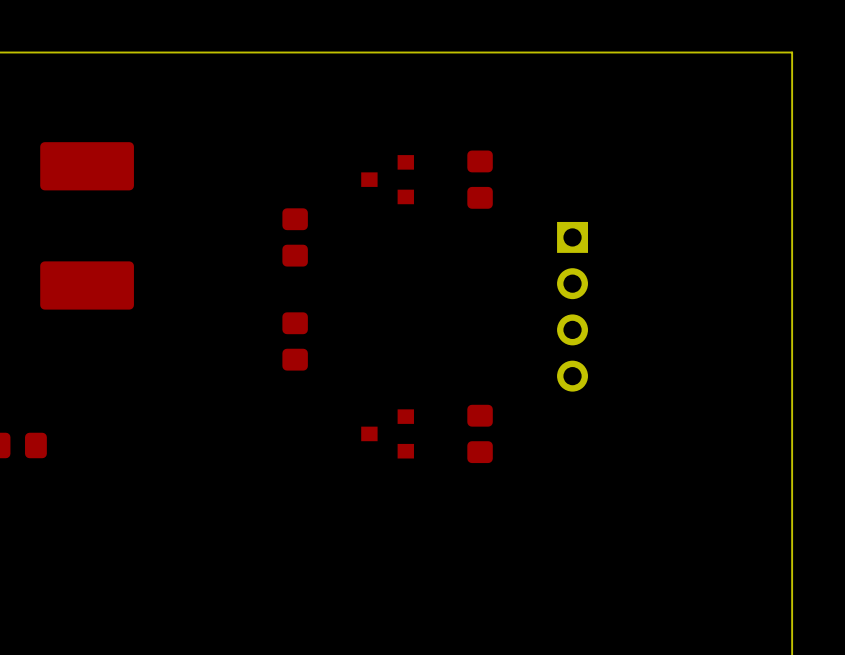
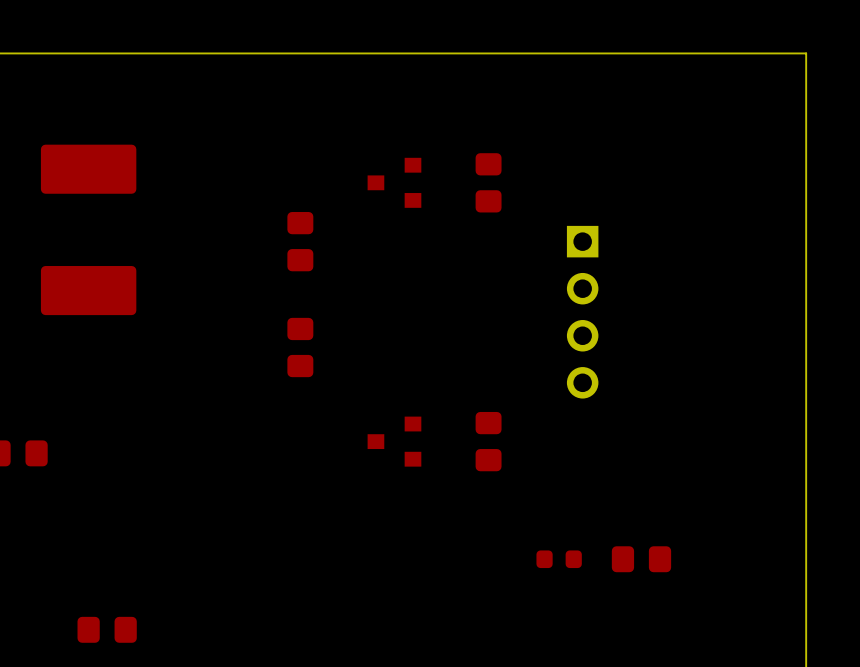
part: none -> (559, 559)
part: none -> (641, 559)
part: none -> (107, 629)

